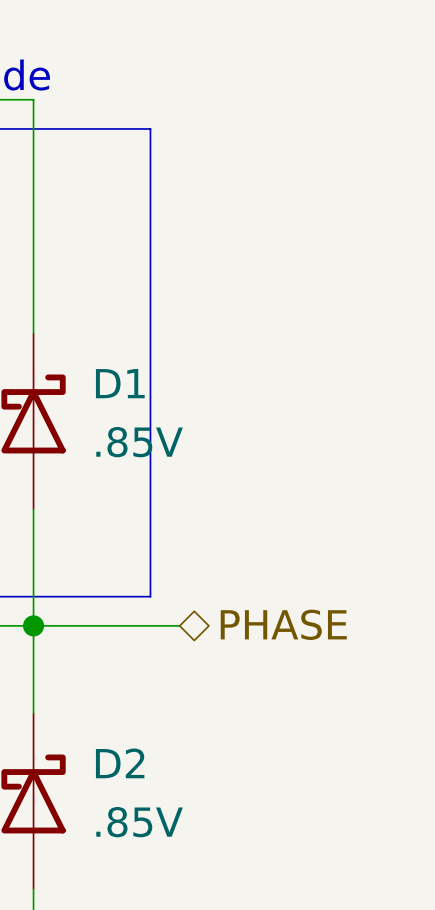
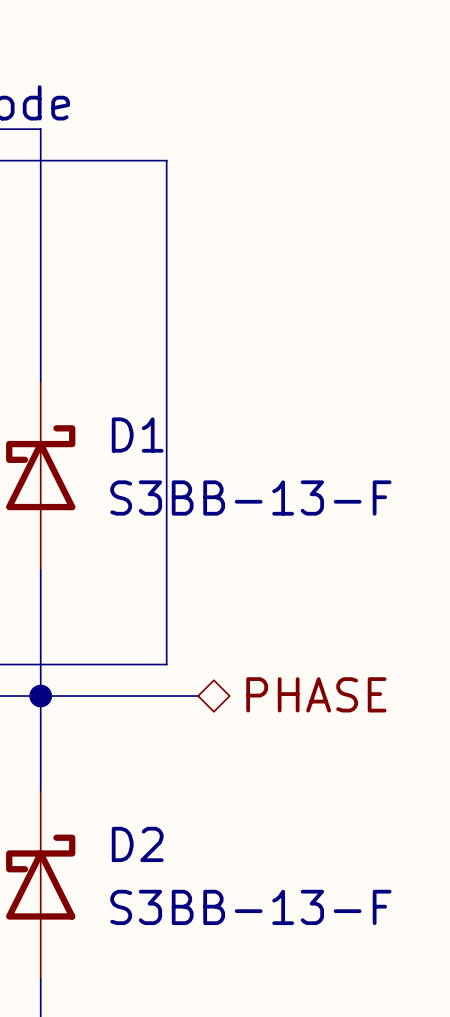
D1 value: .85V (139, 442) -> S3BB-13-F (250, 498)
D2 value: .85V (139, 822) -> S3BB-13-F (250, 907)

